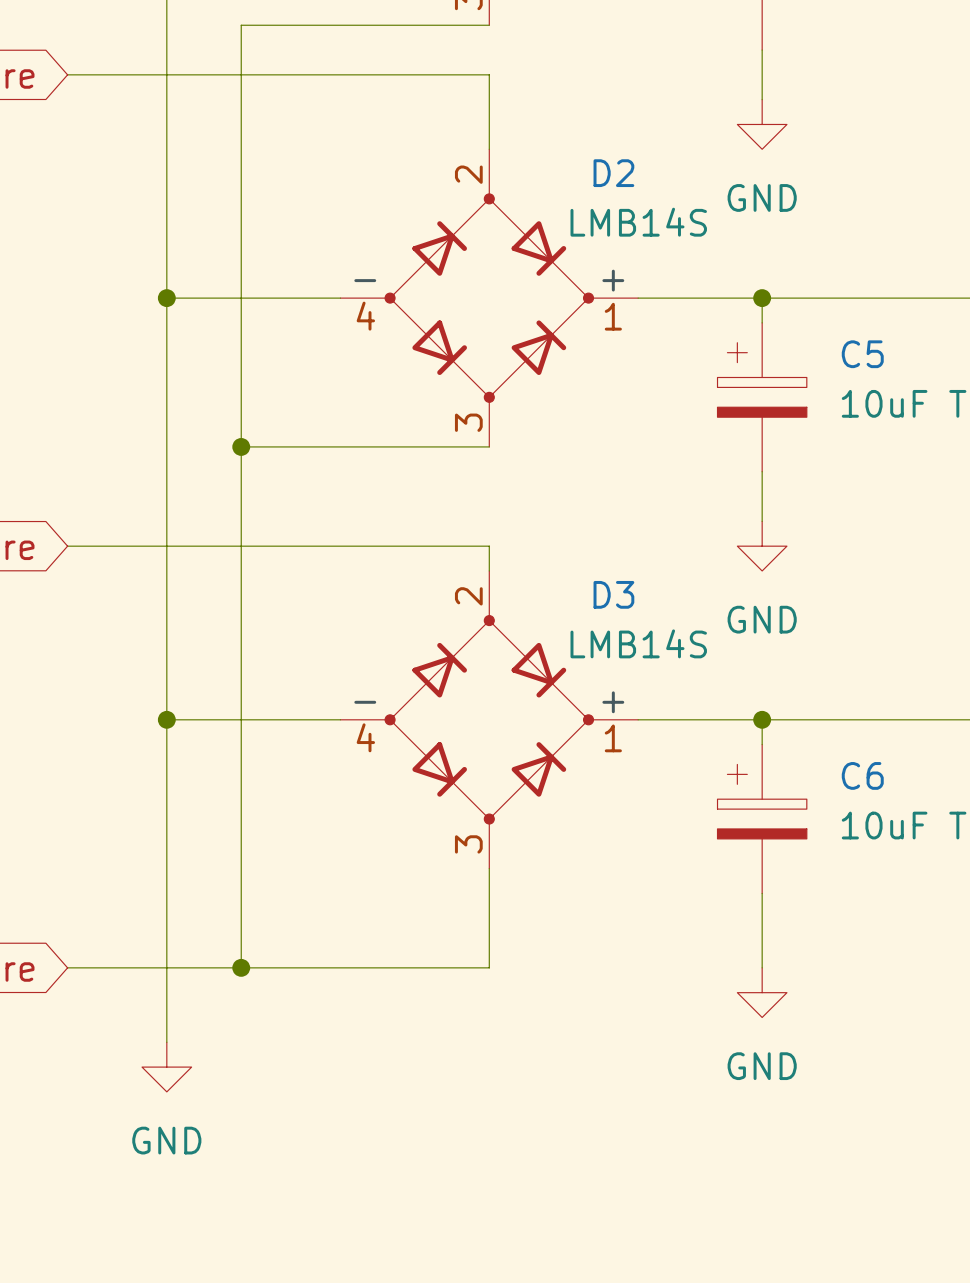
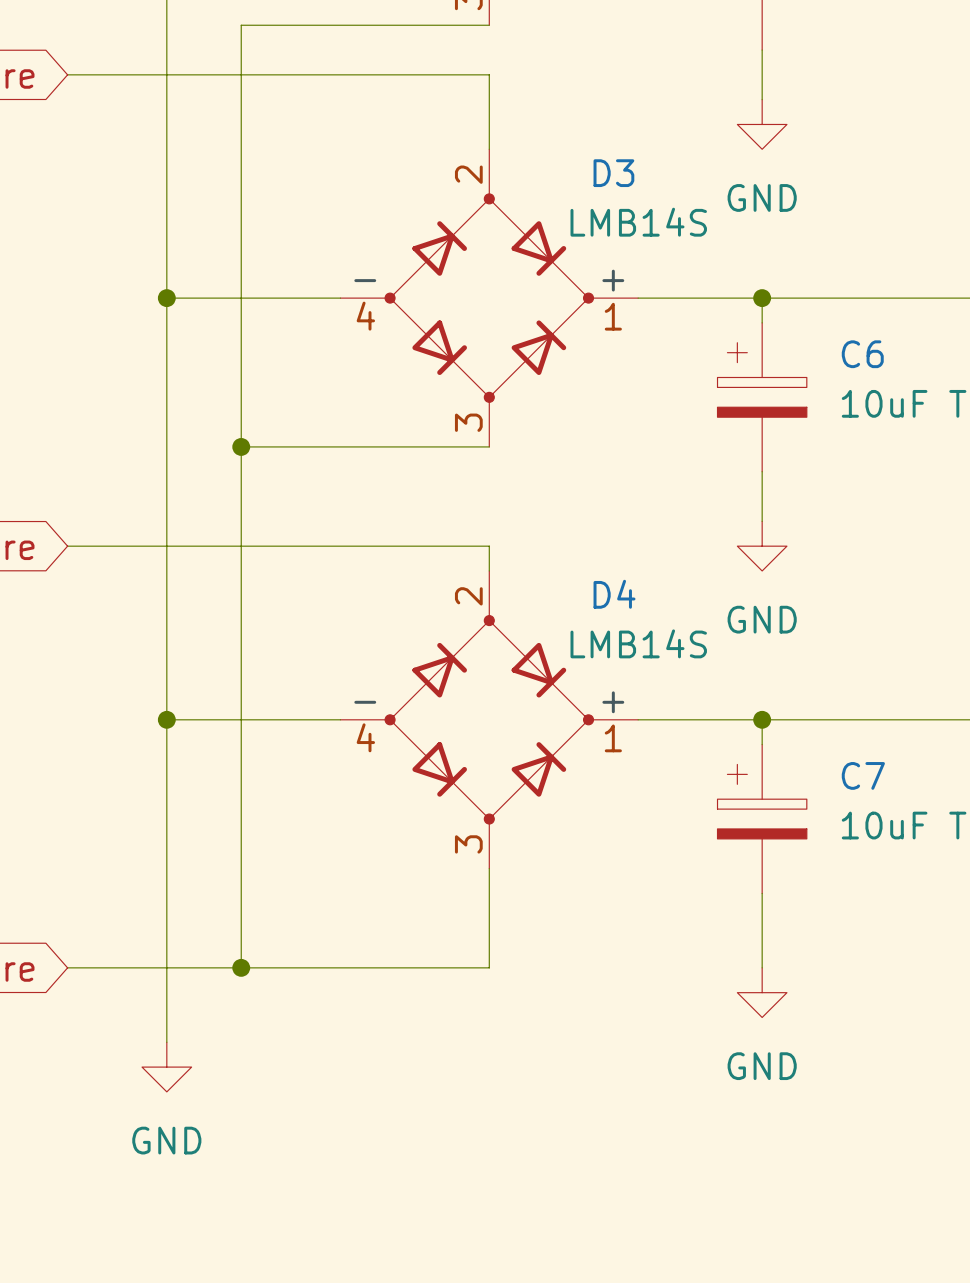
D2 name: D2 (613, 173) -> D3 (613, 173)
C5 name: C5 (862, 354) -> C6 (862, 354)
D3 name: D3 (613, 594) -> D4 (614, 594)
C6 name: C6 (862, 775) -> C7 (863, 775)

